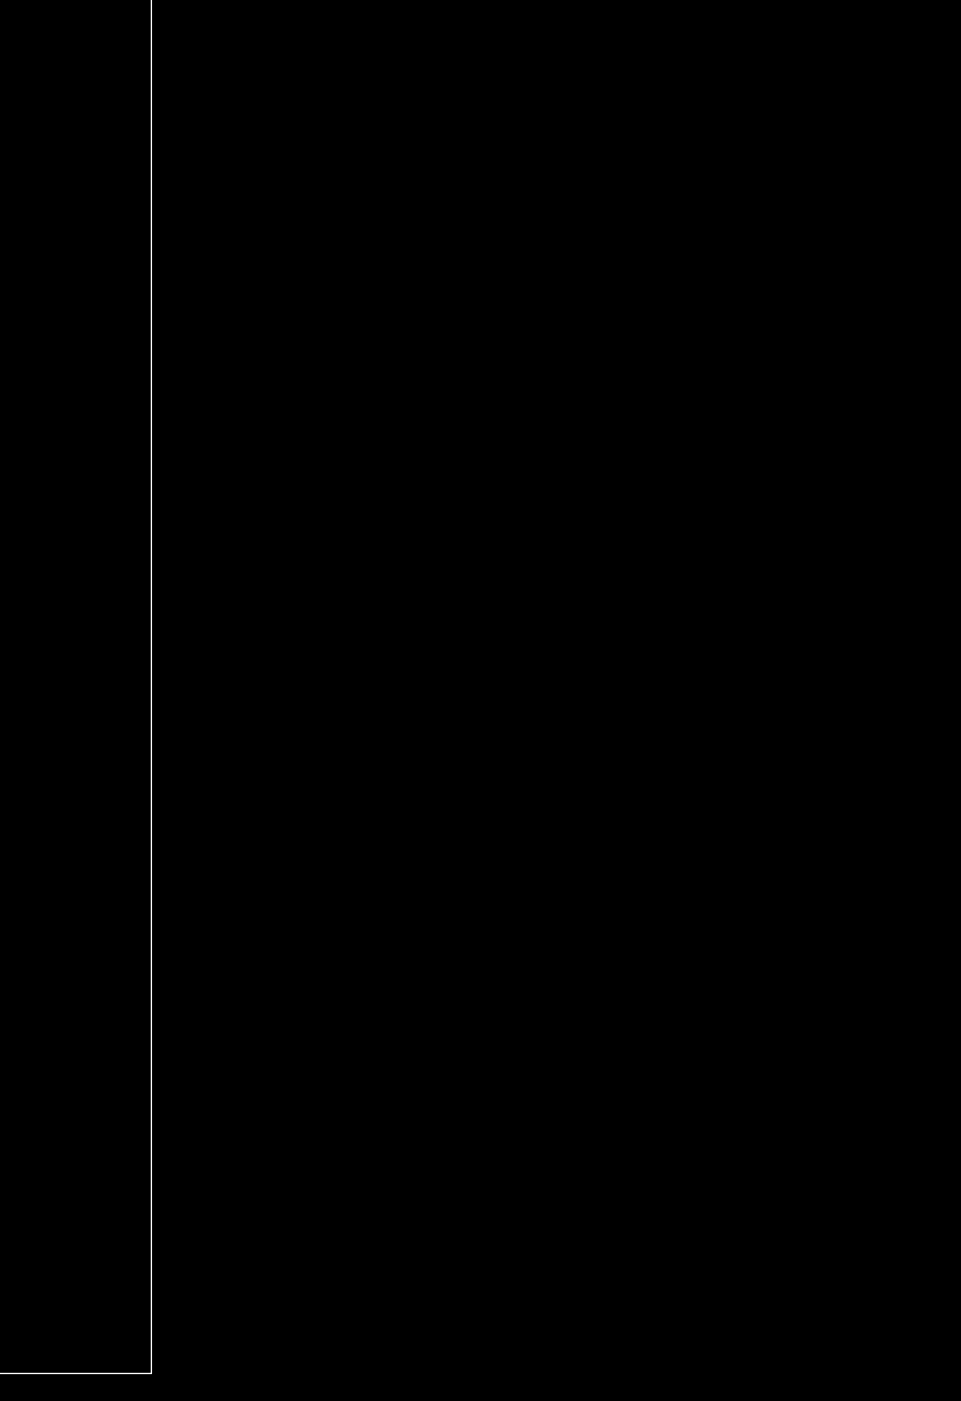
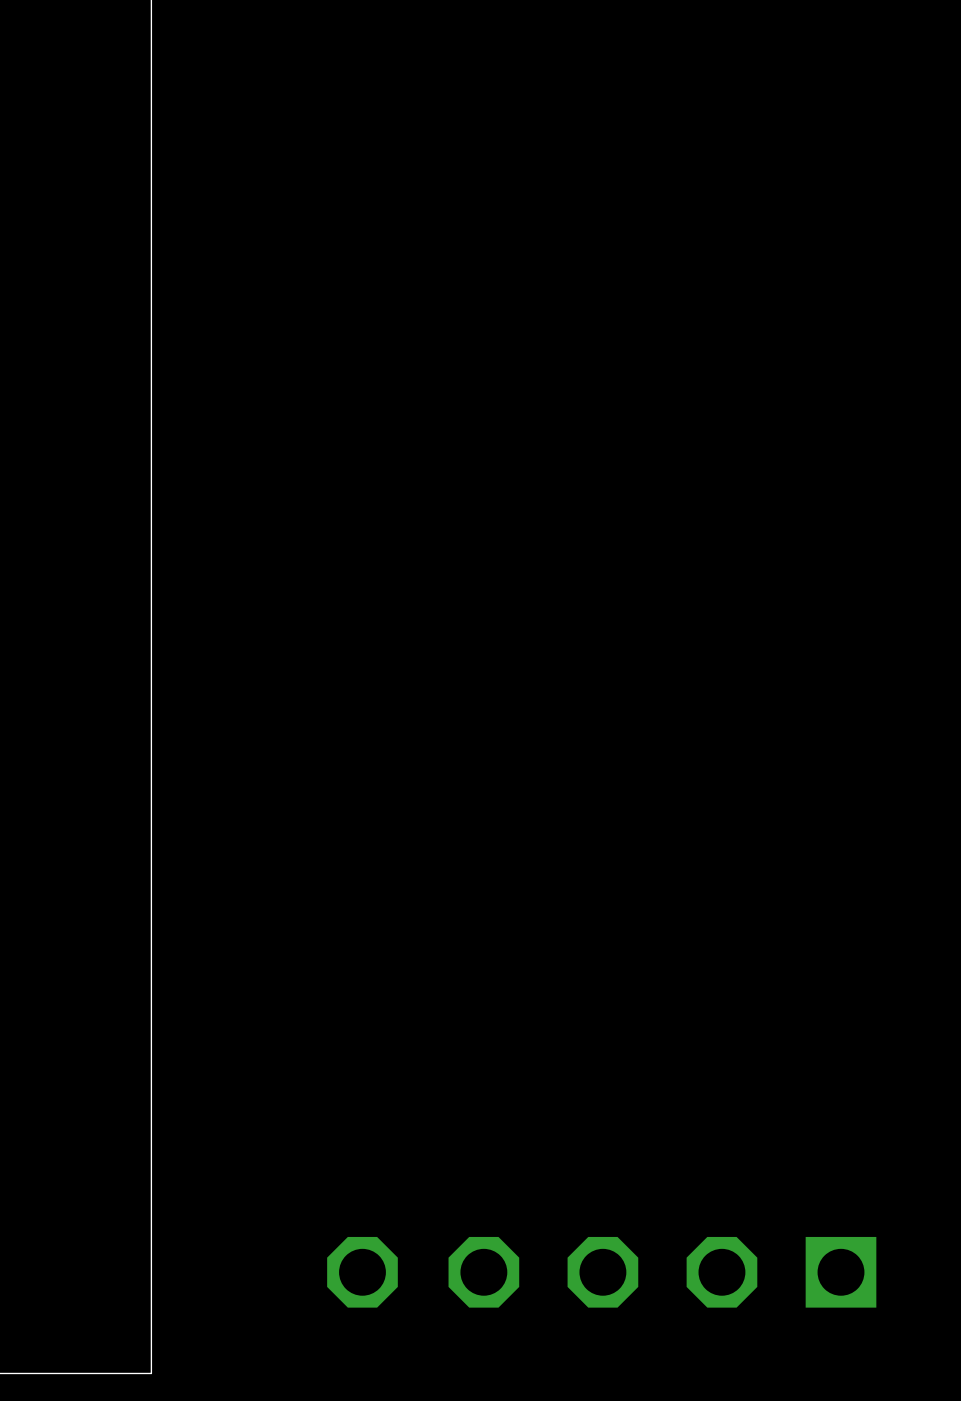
part: none -> (601, 1272)

